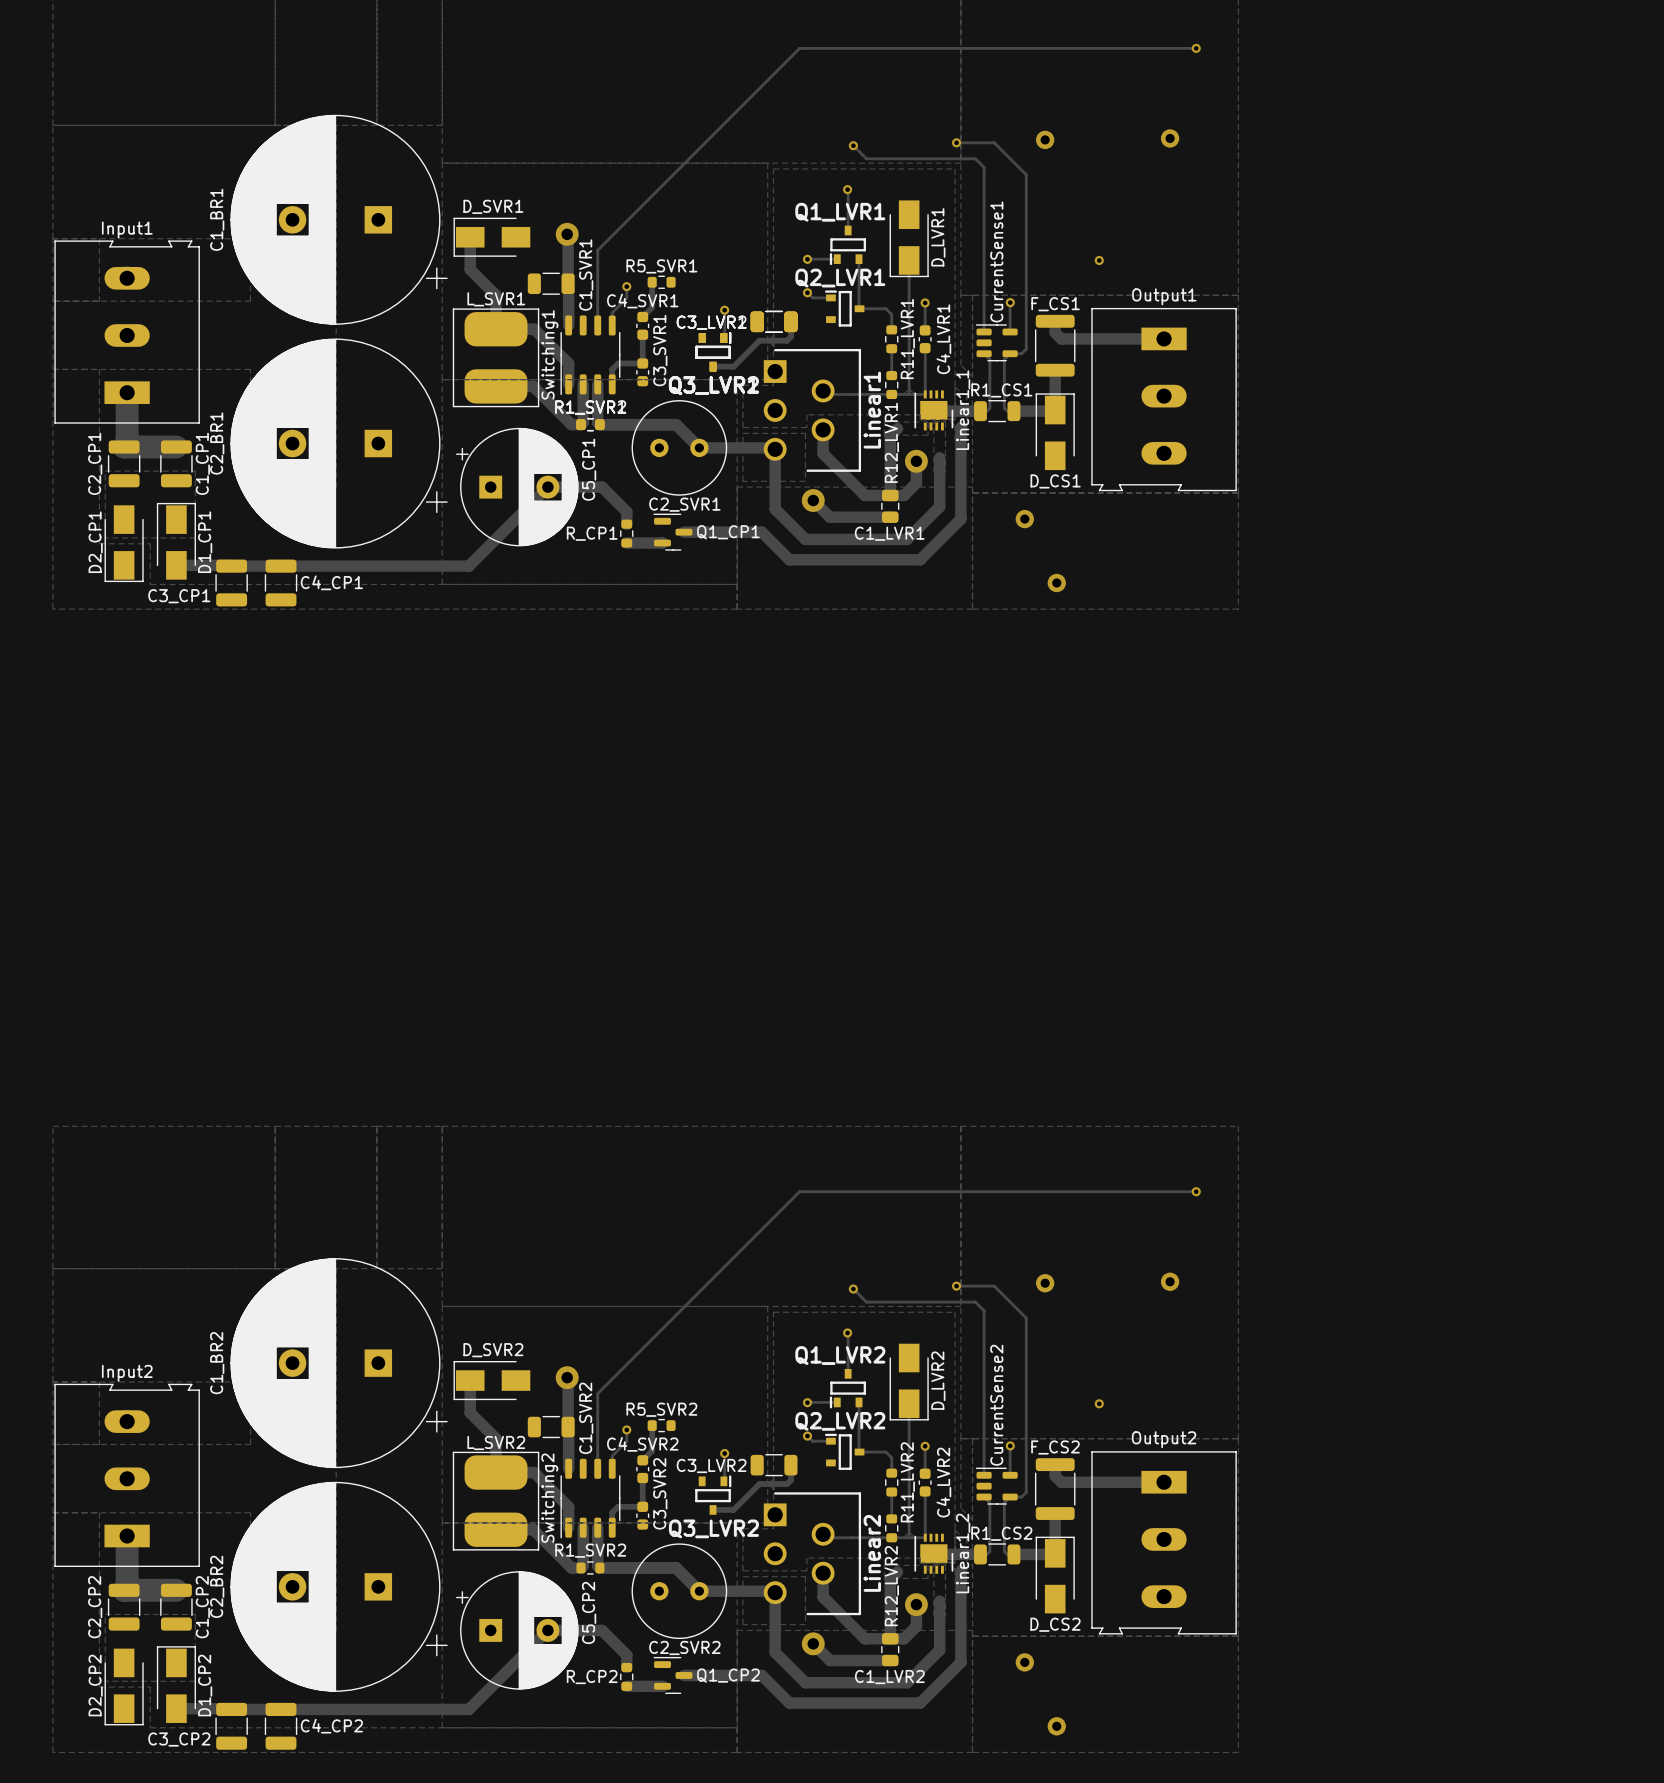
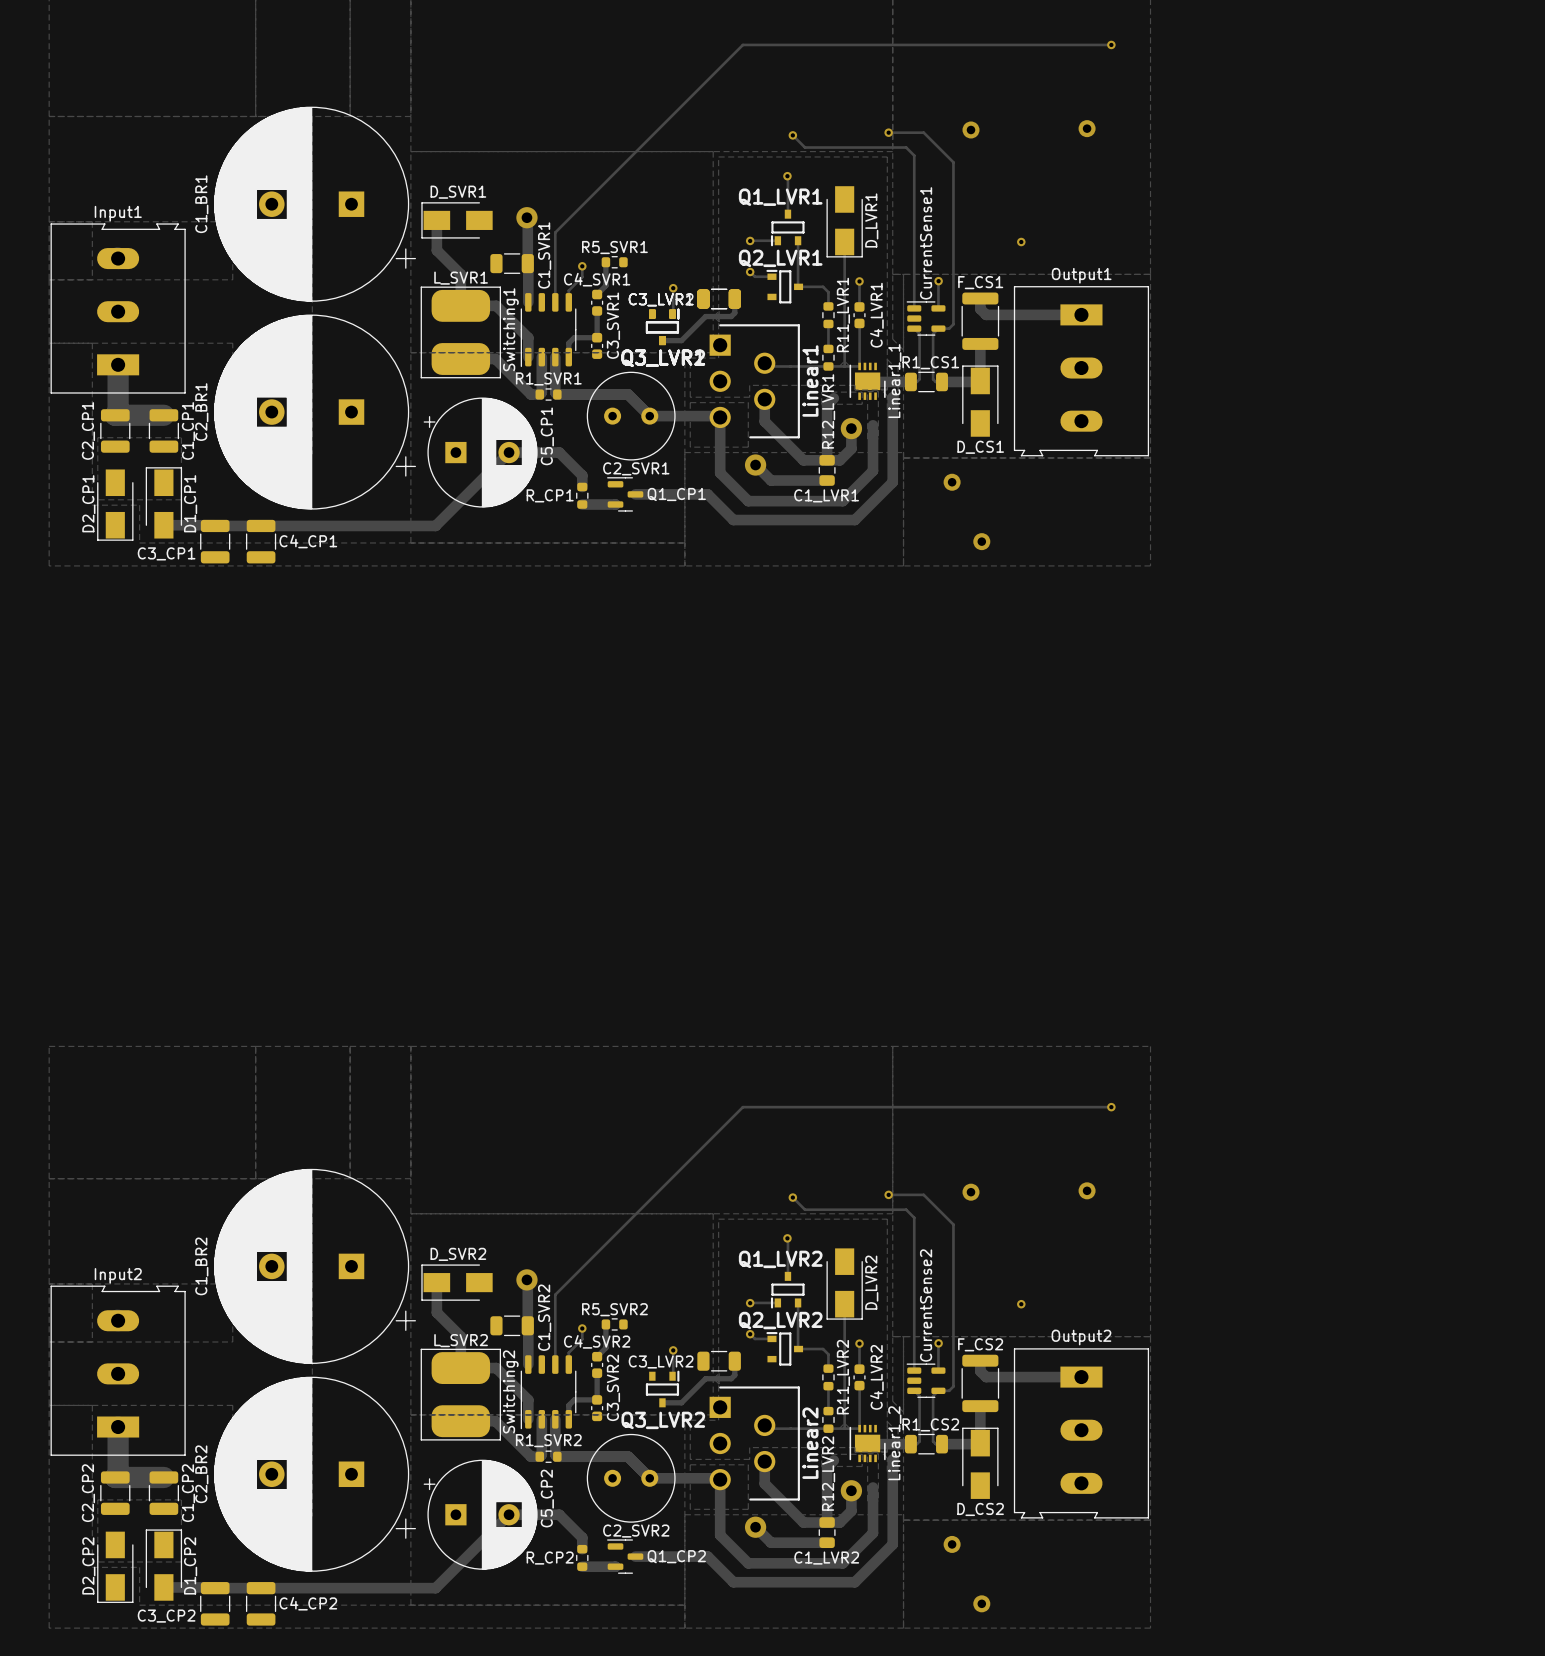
part: (590, 424) -> none

